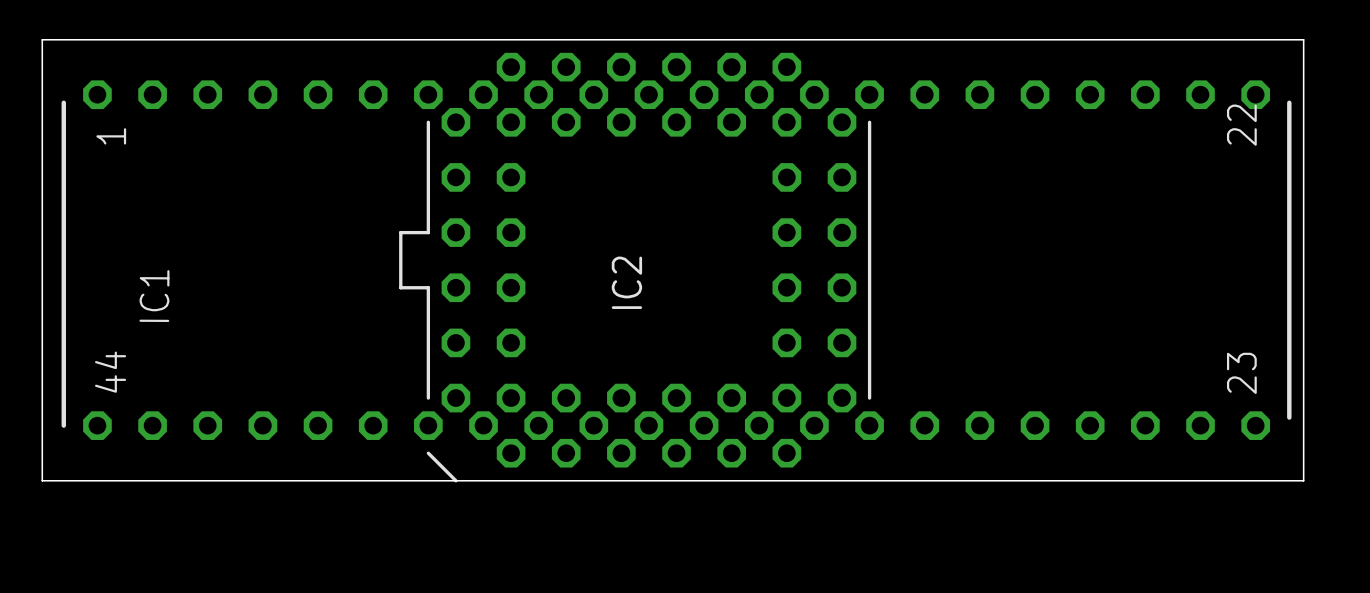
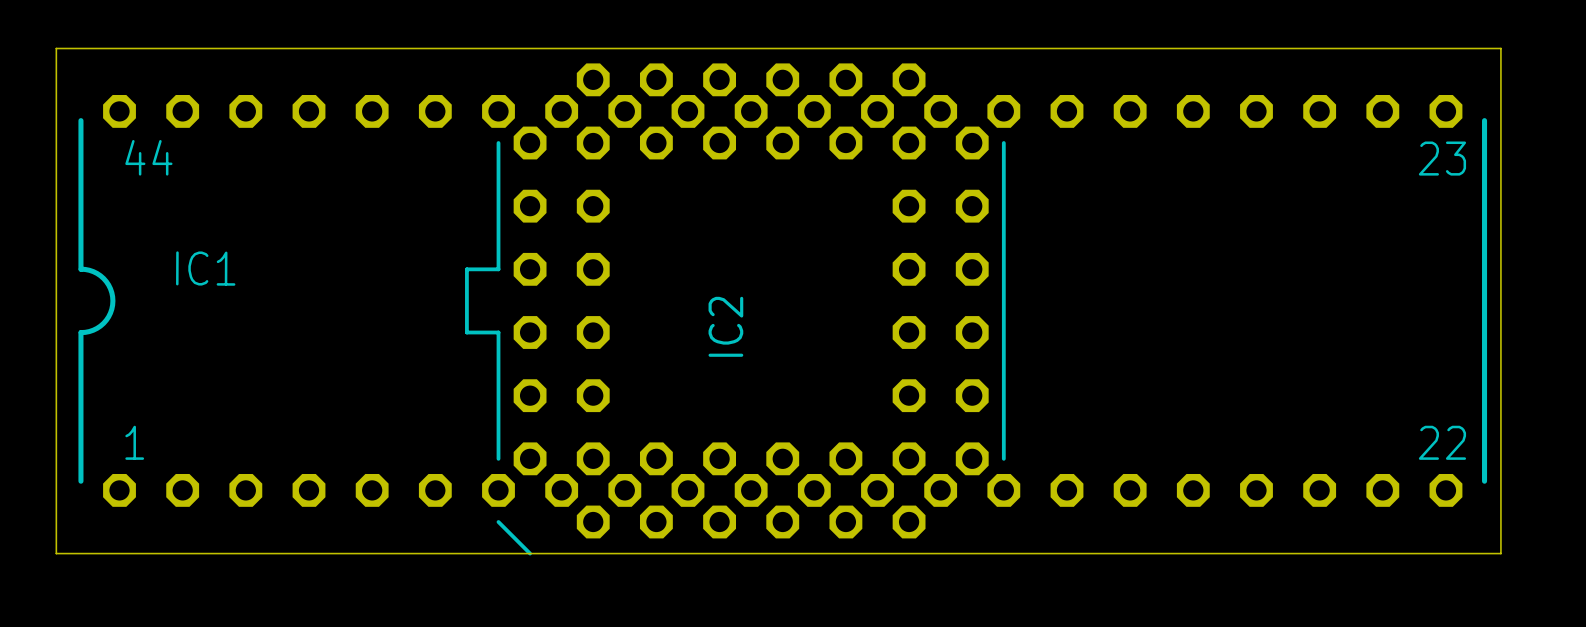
IC1 footprint: [61, 80, 1292, 440] -> [78, 95, 1488, 507]
IC1 name position: IC1 (154, 296) -> IC1 (205, 268)

